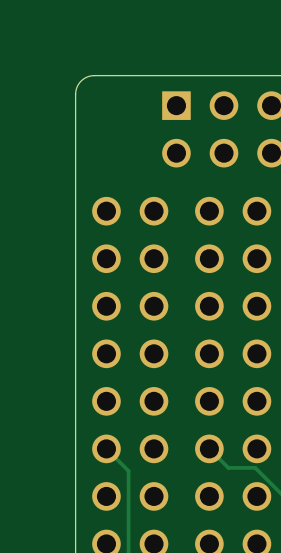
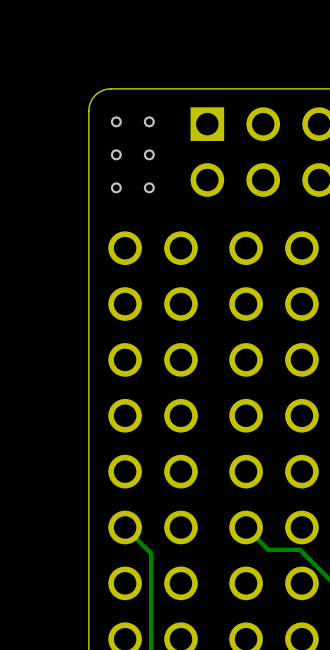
via: none -> (116, 121)
via: none -> (149, 121)
via: none -> (116, 154)
via: none -> (149, 154)
via: none -> (116, 187)
via: none -> (149, 187)

